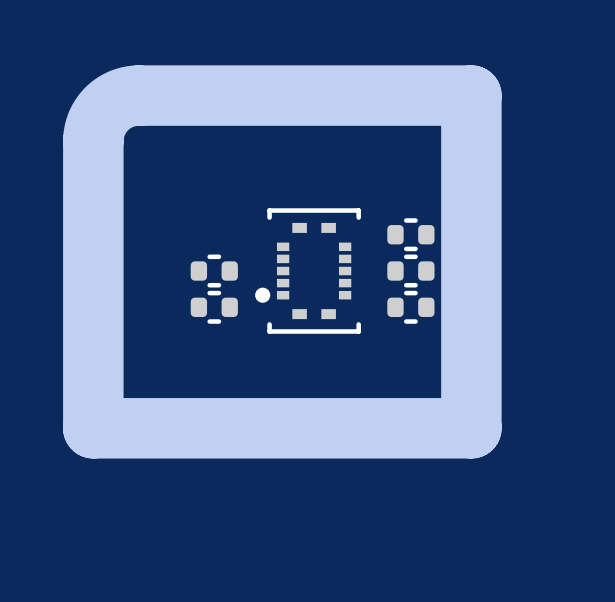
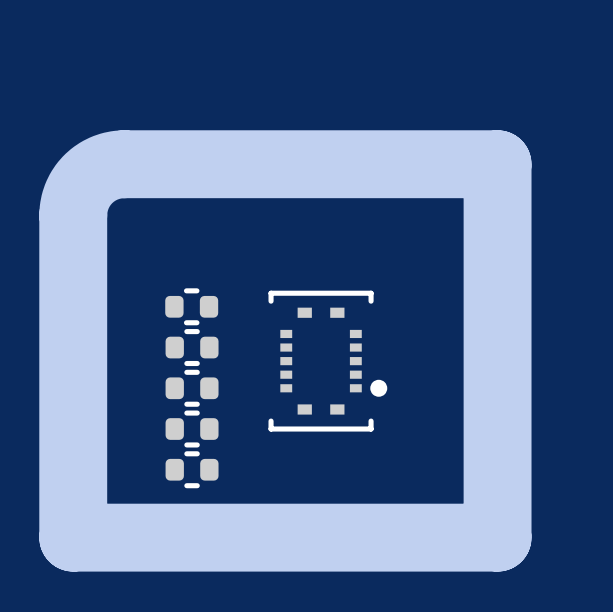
part footprint: [255, 208, 361, 334] -> [268, 290, 388, 432]
part: none -> (191, 306)
part: (410, 234) -> none
part: none -> (192, 347)
part: (214, 271) -> none
part: (410, 271) -> none
part: none -> (192, 388)
part: (214, 307) -> none
part: (410, 307) -> none
part: none -> (192, 429)
part: none -> (192, 469)

